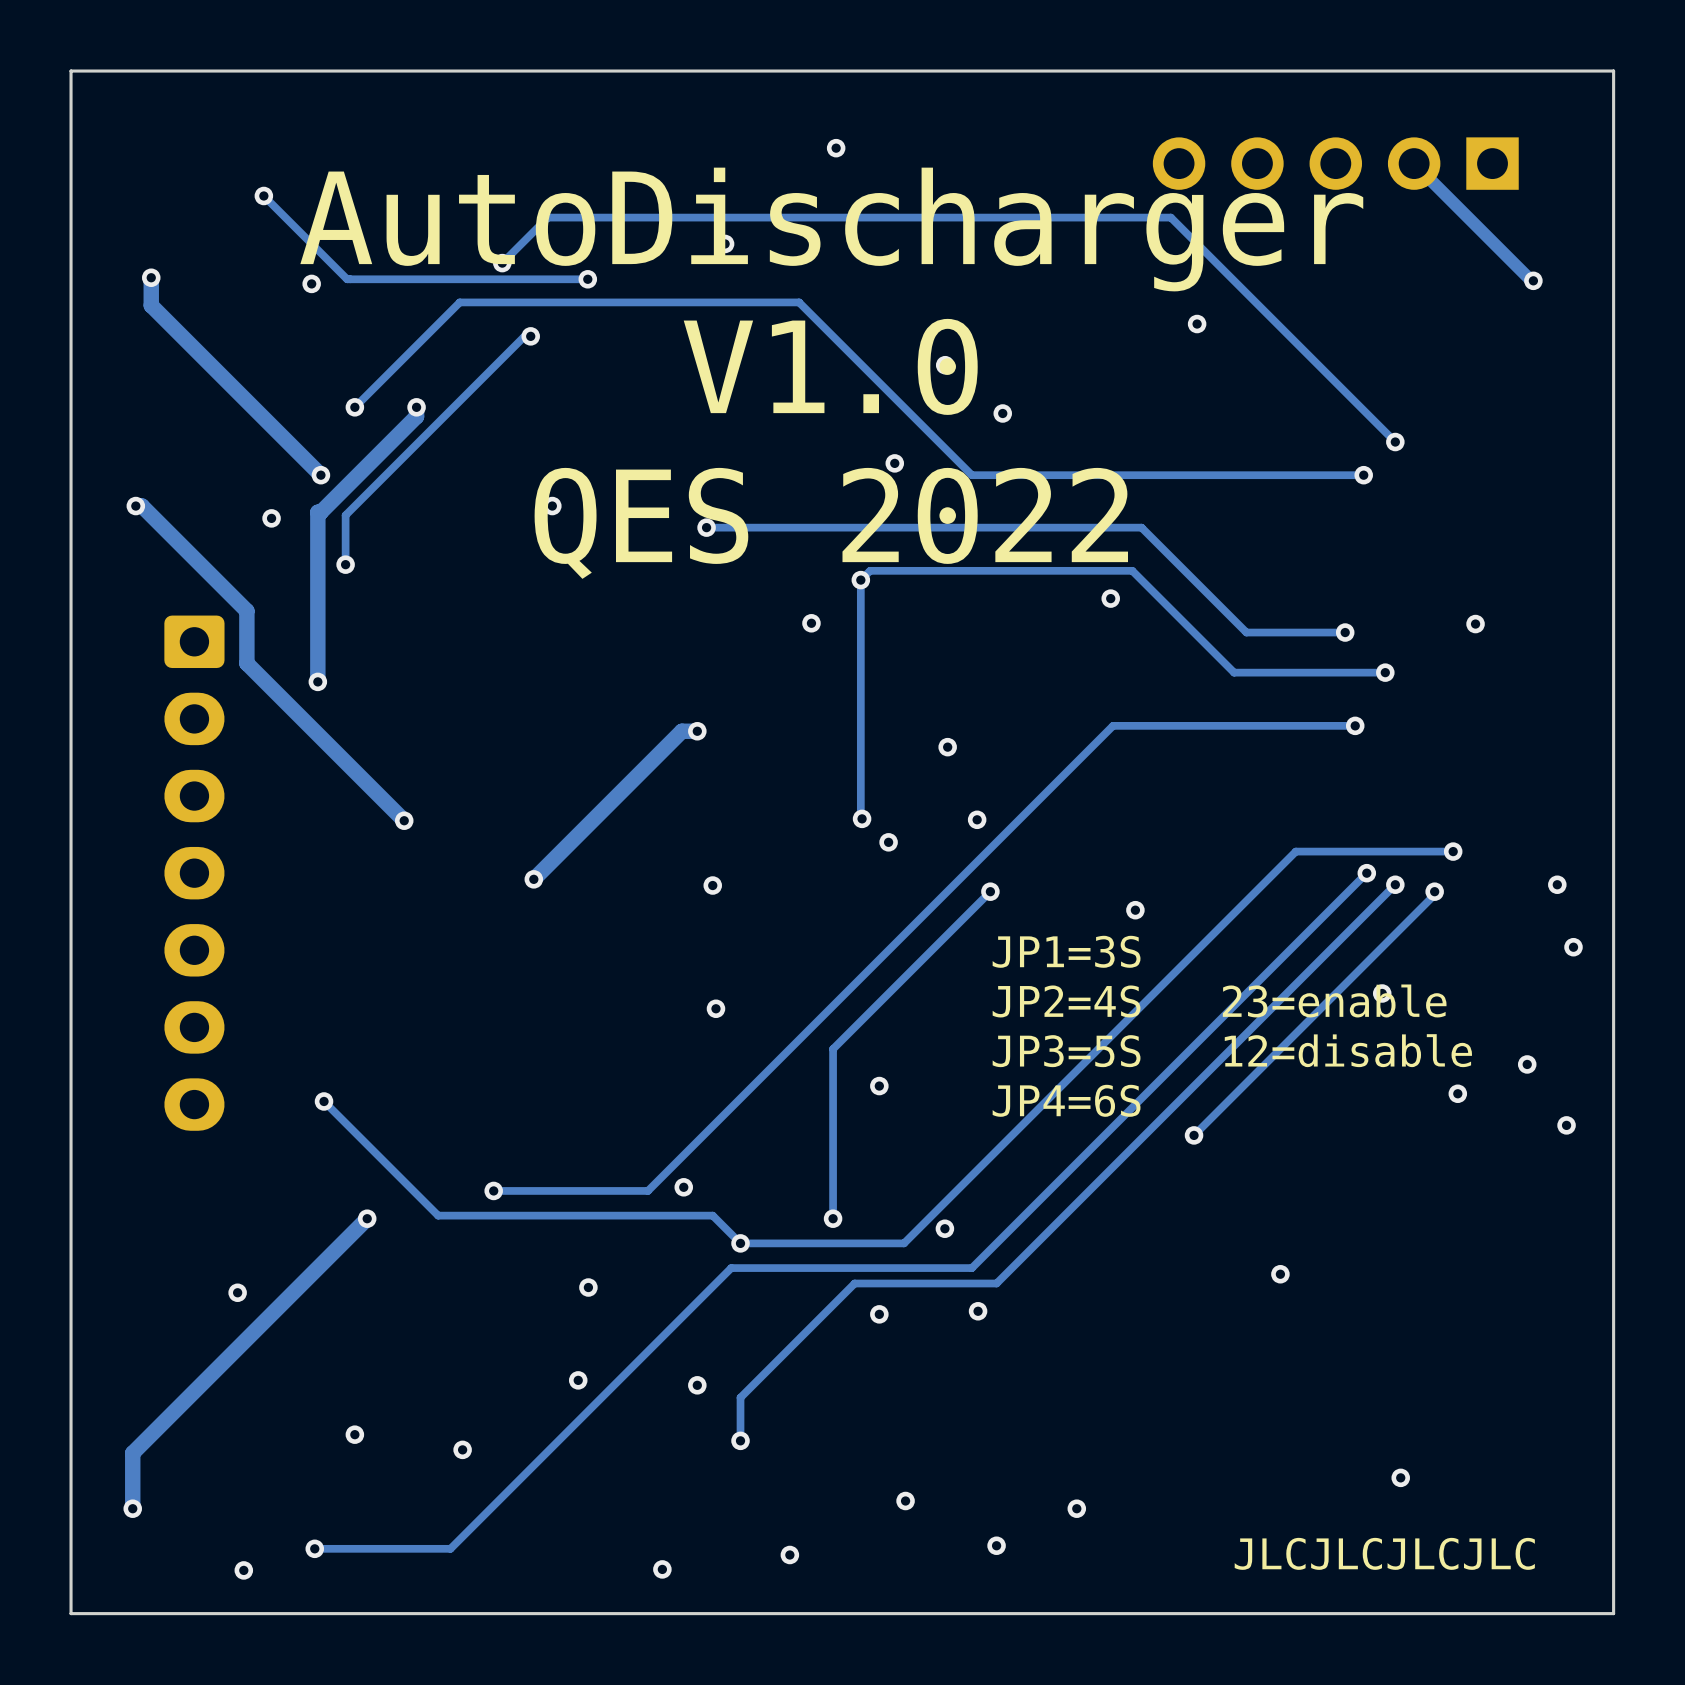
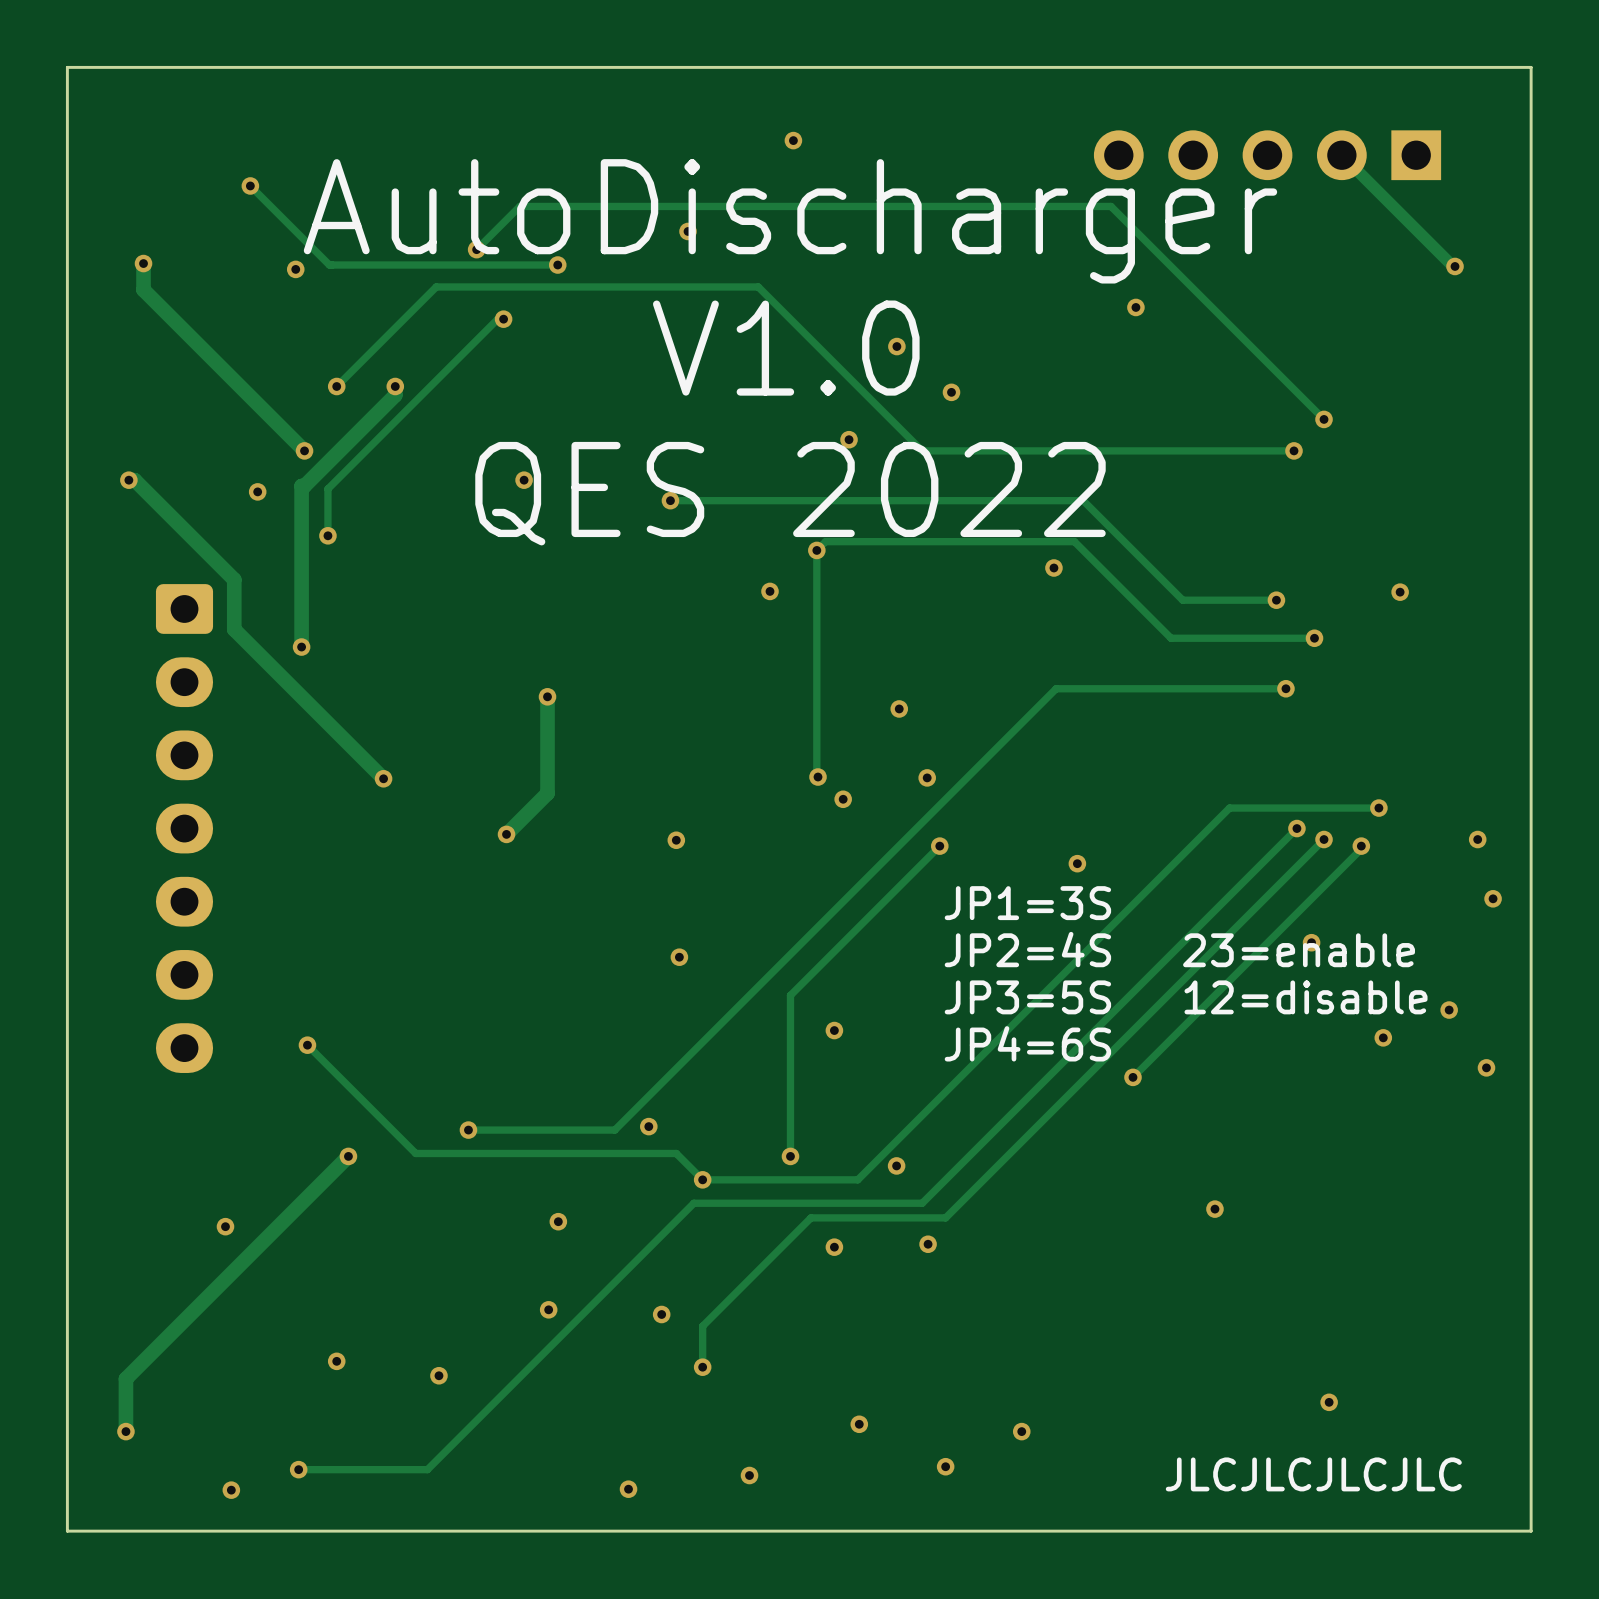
track: (697, 731) (681, 731) (577, 836) -> (547, 696) (547, 793)
via position: (697, 731) -> (547, 696)

